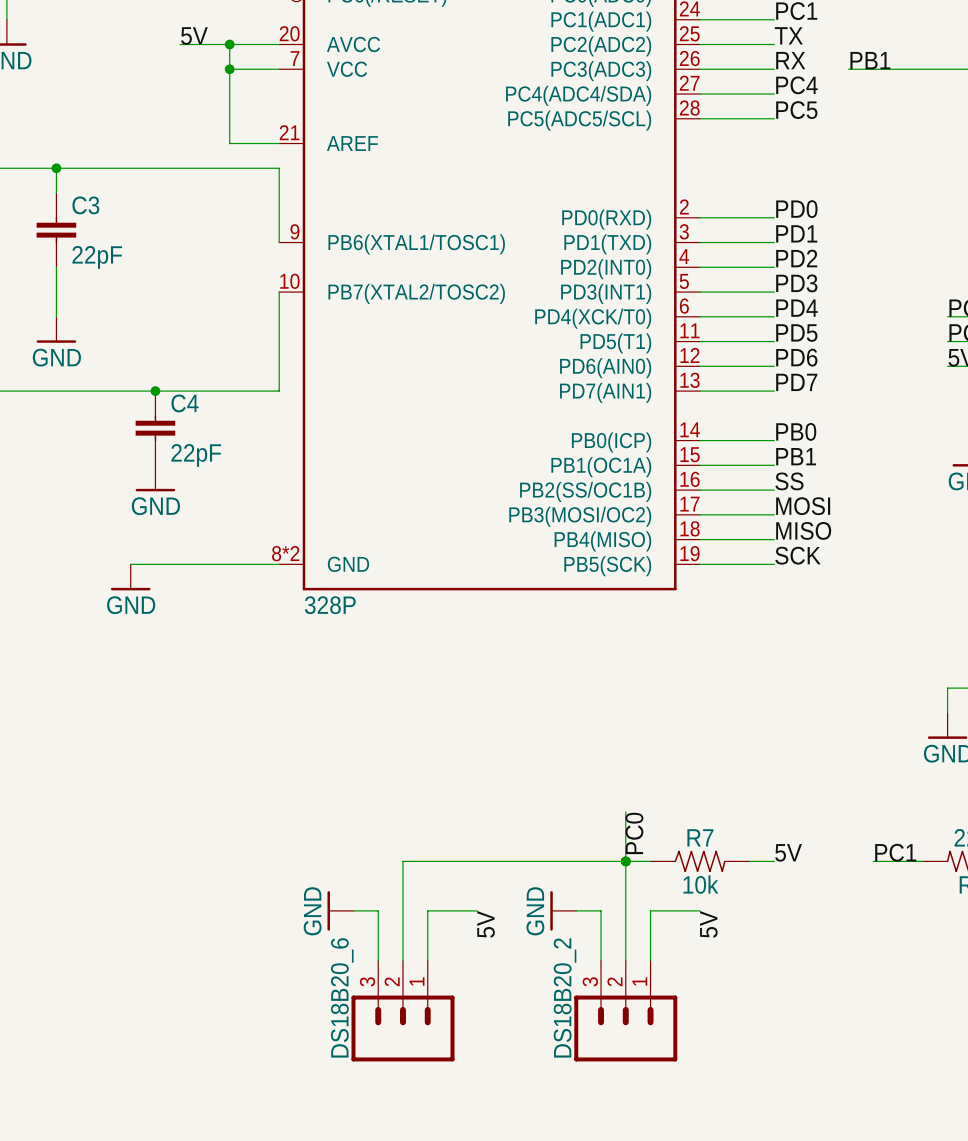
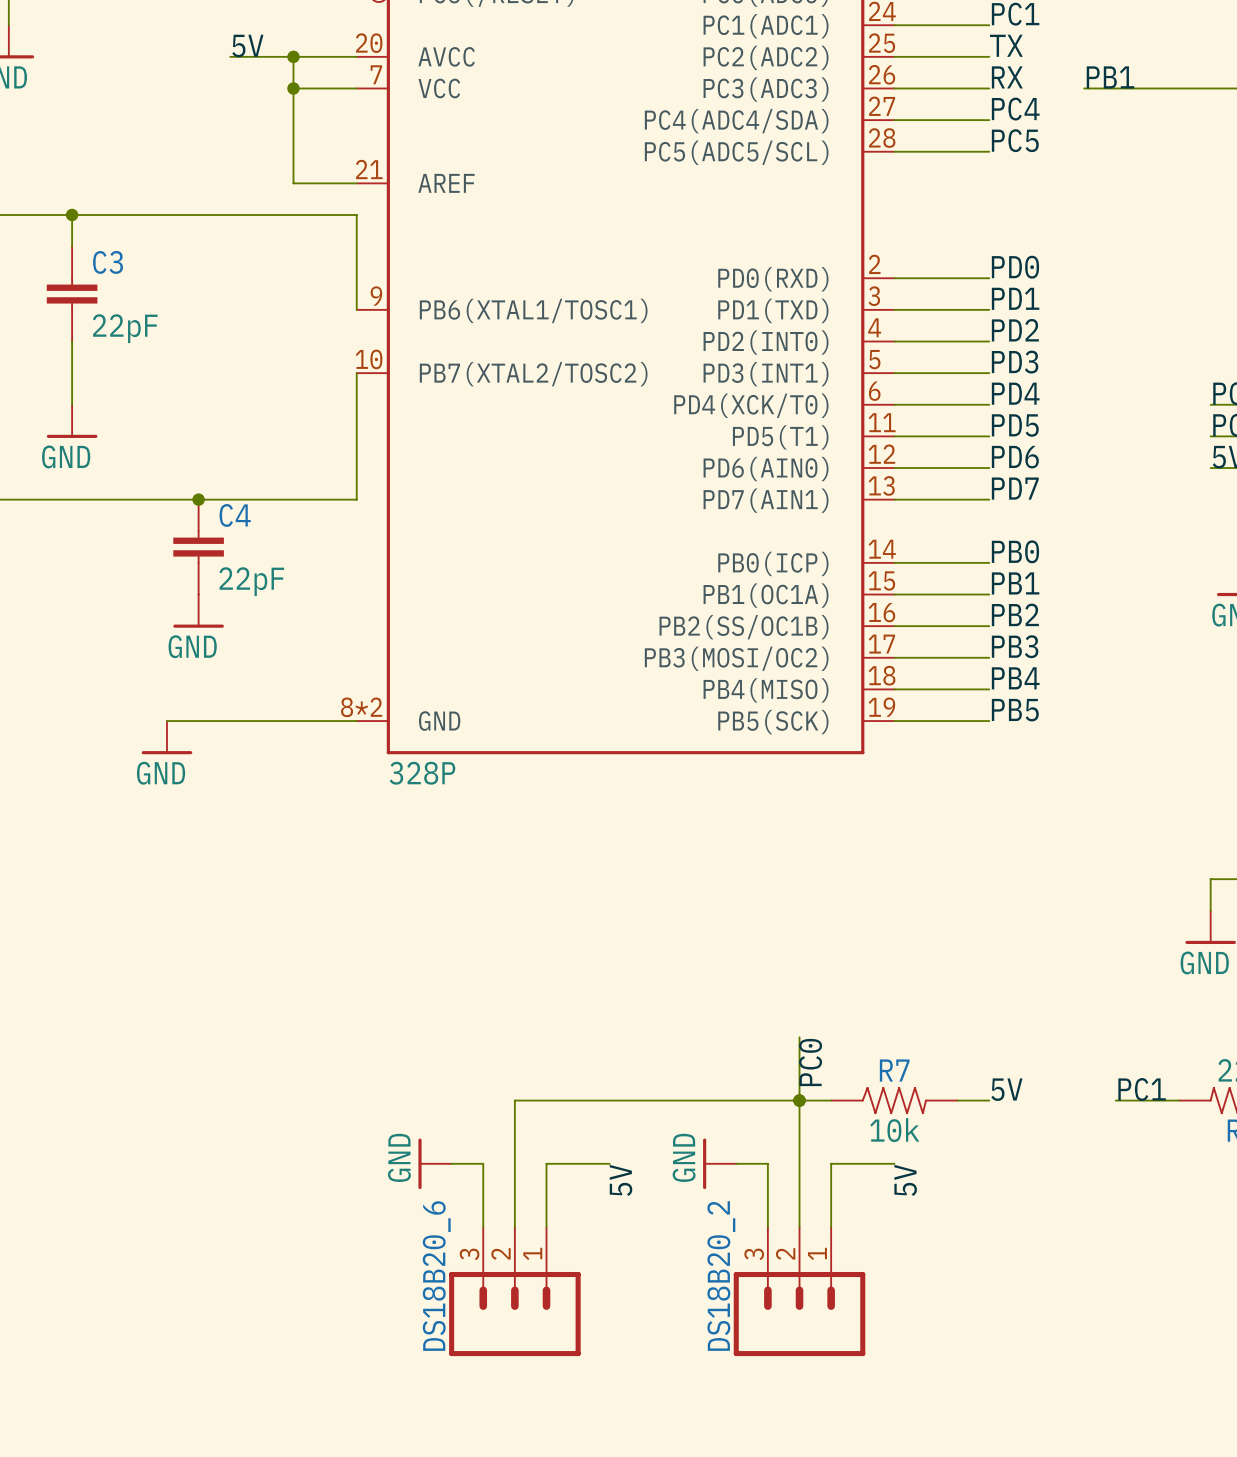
label: SS (789, 481) -> PB2 (1015, 614)
label: MOSI (803, 506) -> PB3 (1015, 646)
label: MISO (803, 530) -> PB4 (1015, 678)
label: SCK (798, 555) -> PB5 (1015, 710)

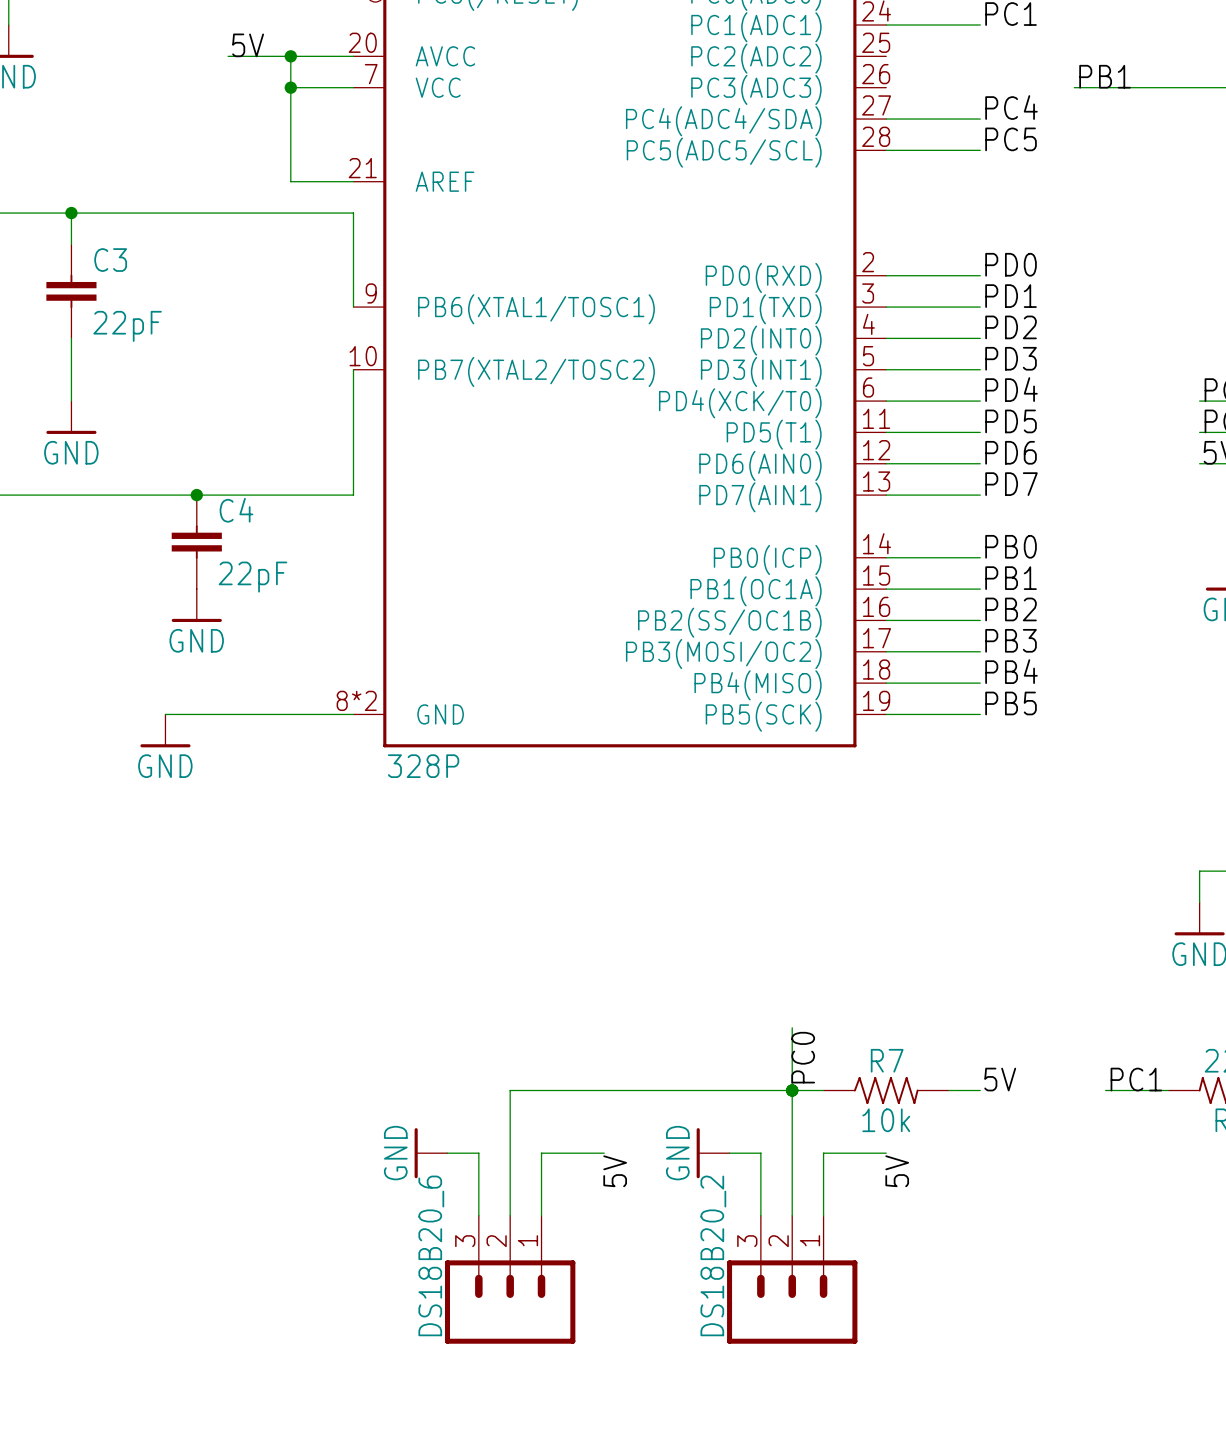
label: TX (1006, 45) -> none
wire: (894, 56) (989, 56) -> none
label: RX (1007, 77) -> none
wire: (894, 88) (989, 88) -> none

